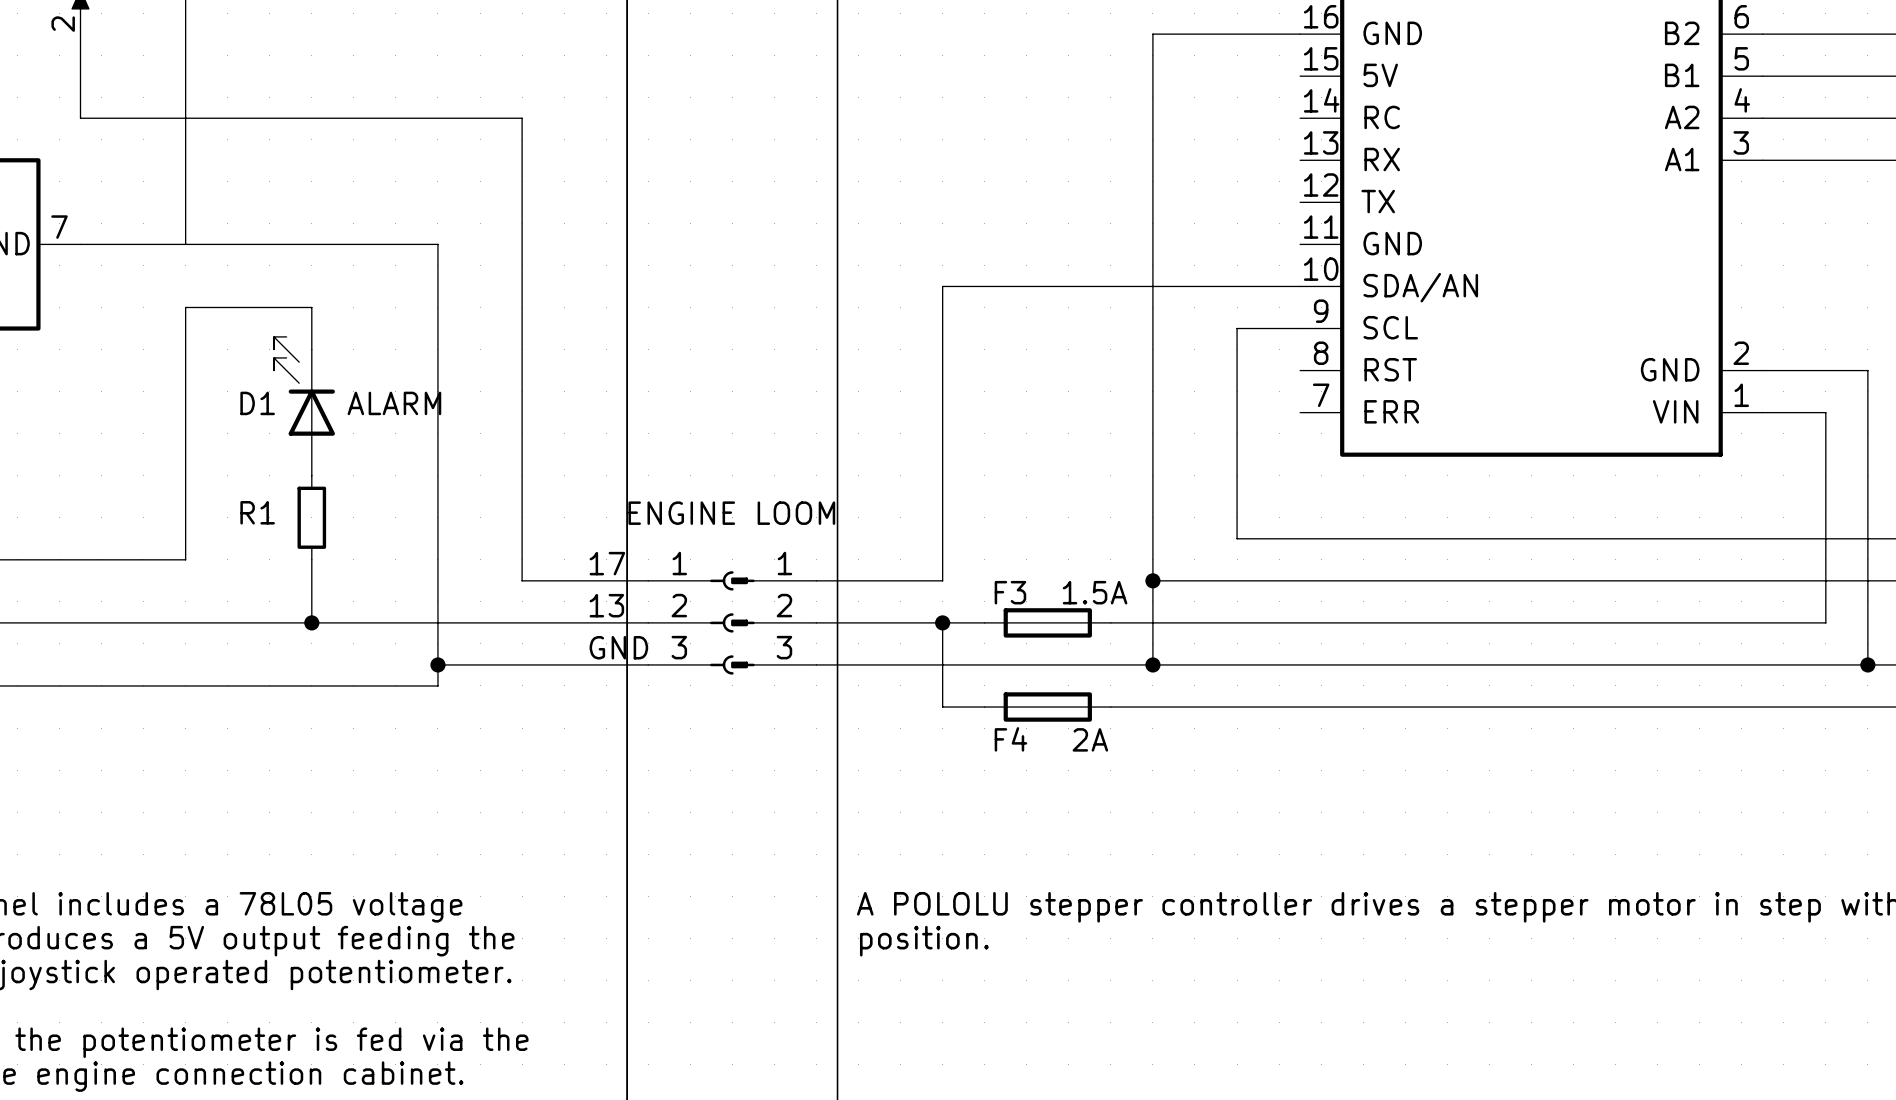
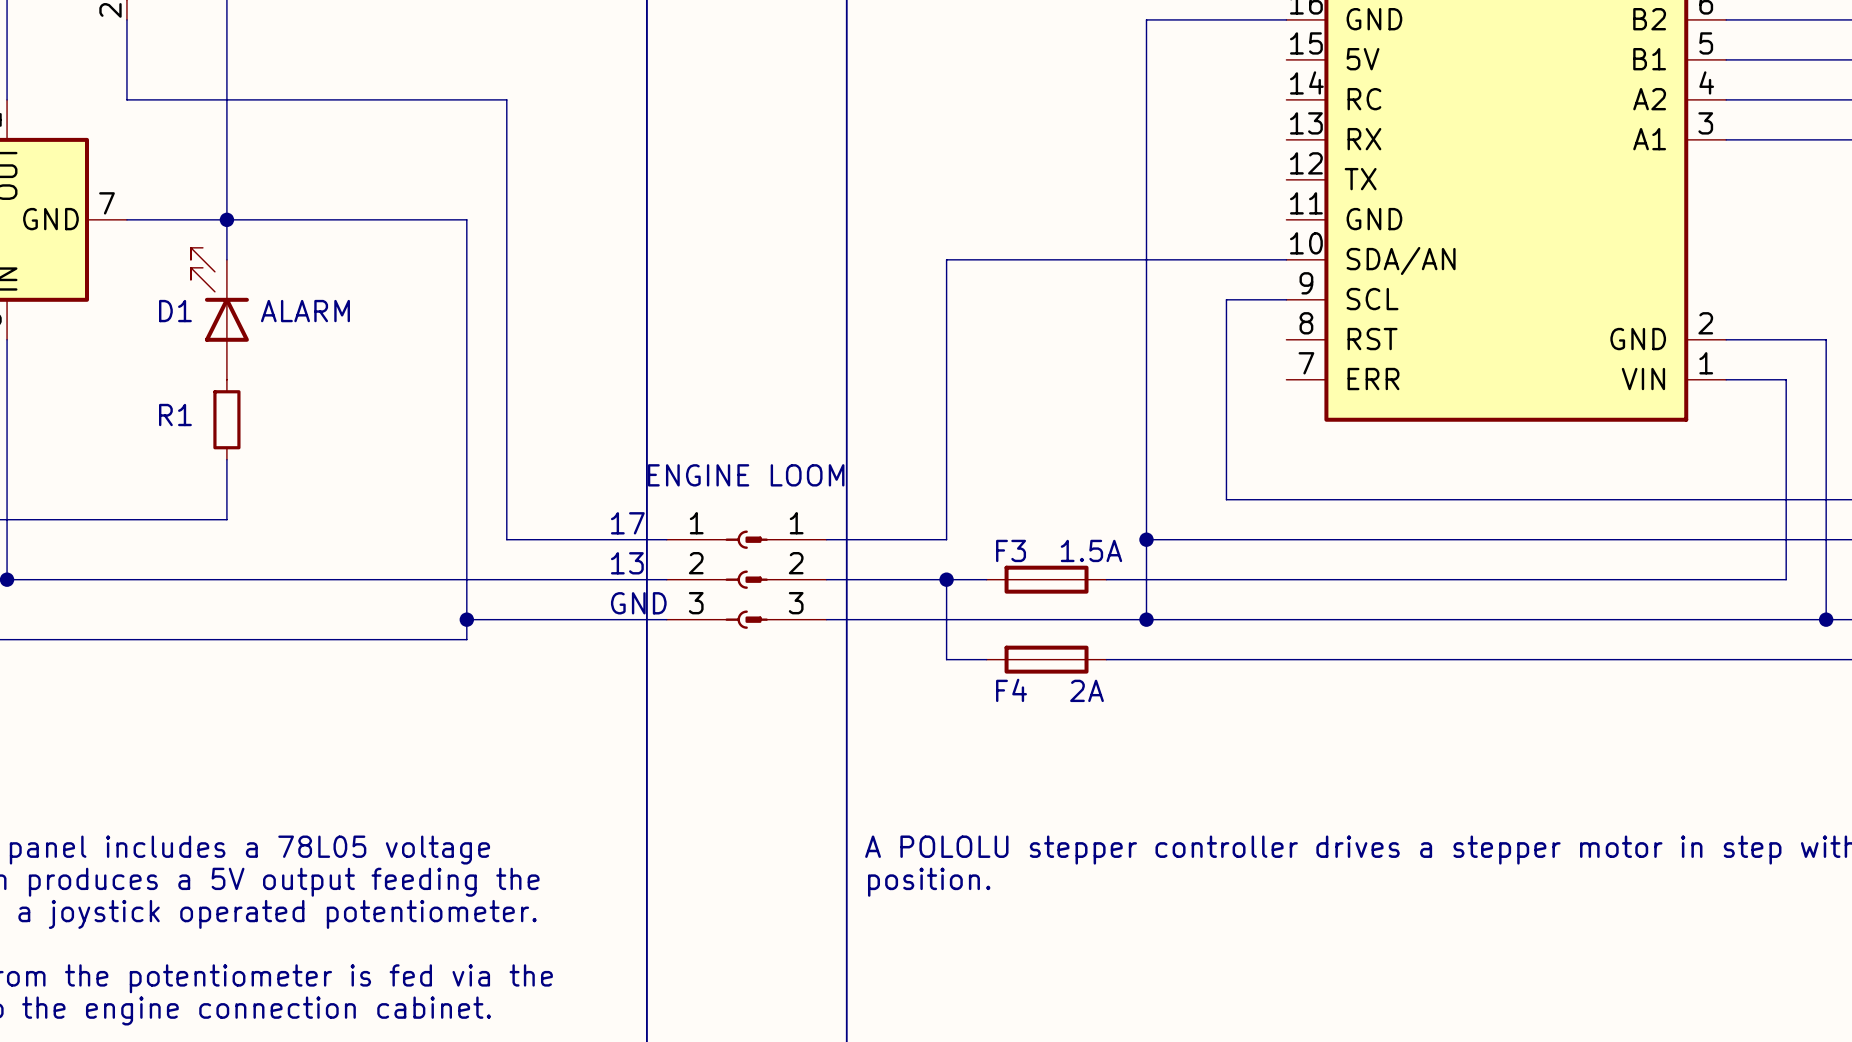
wire: (480, 118) (522, 118) (522, 580) -> (506, 99) (506, 539) (546, 539)
wire: none -> (226, 219) (226, 259)
junction: none -> (226, 219)
wire: (311, 349) (311, 307) (185, 307) (185, 496) -> none
D1 position: (304, 406) -> (219, 313)
R1 position: (311, 517) -> (226, 419)
wire: (311, 559) (311, 622) -> none
junction: (311, 622) -> none

